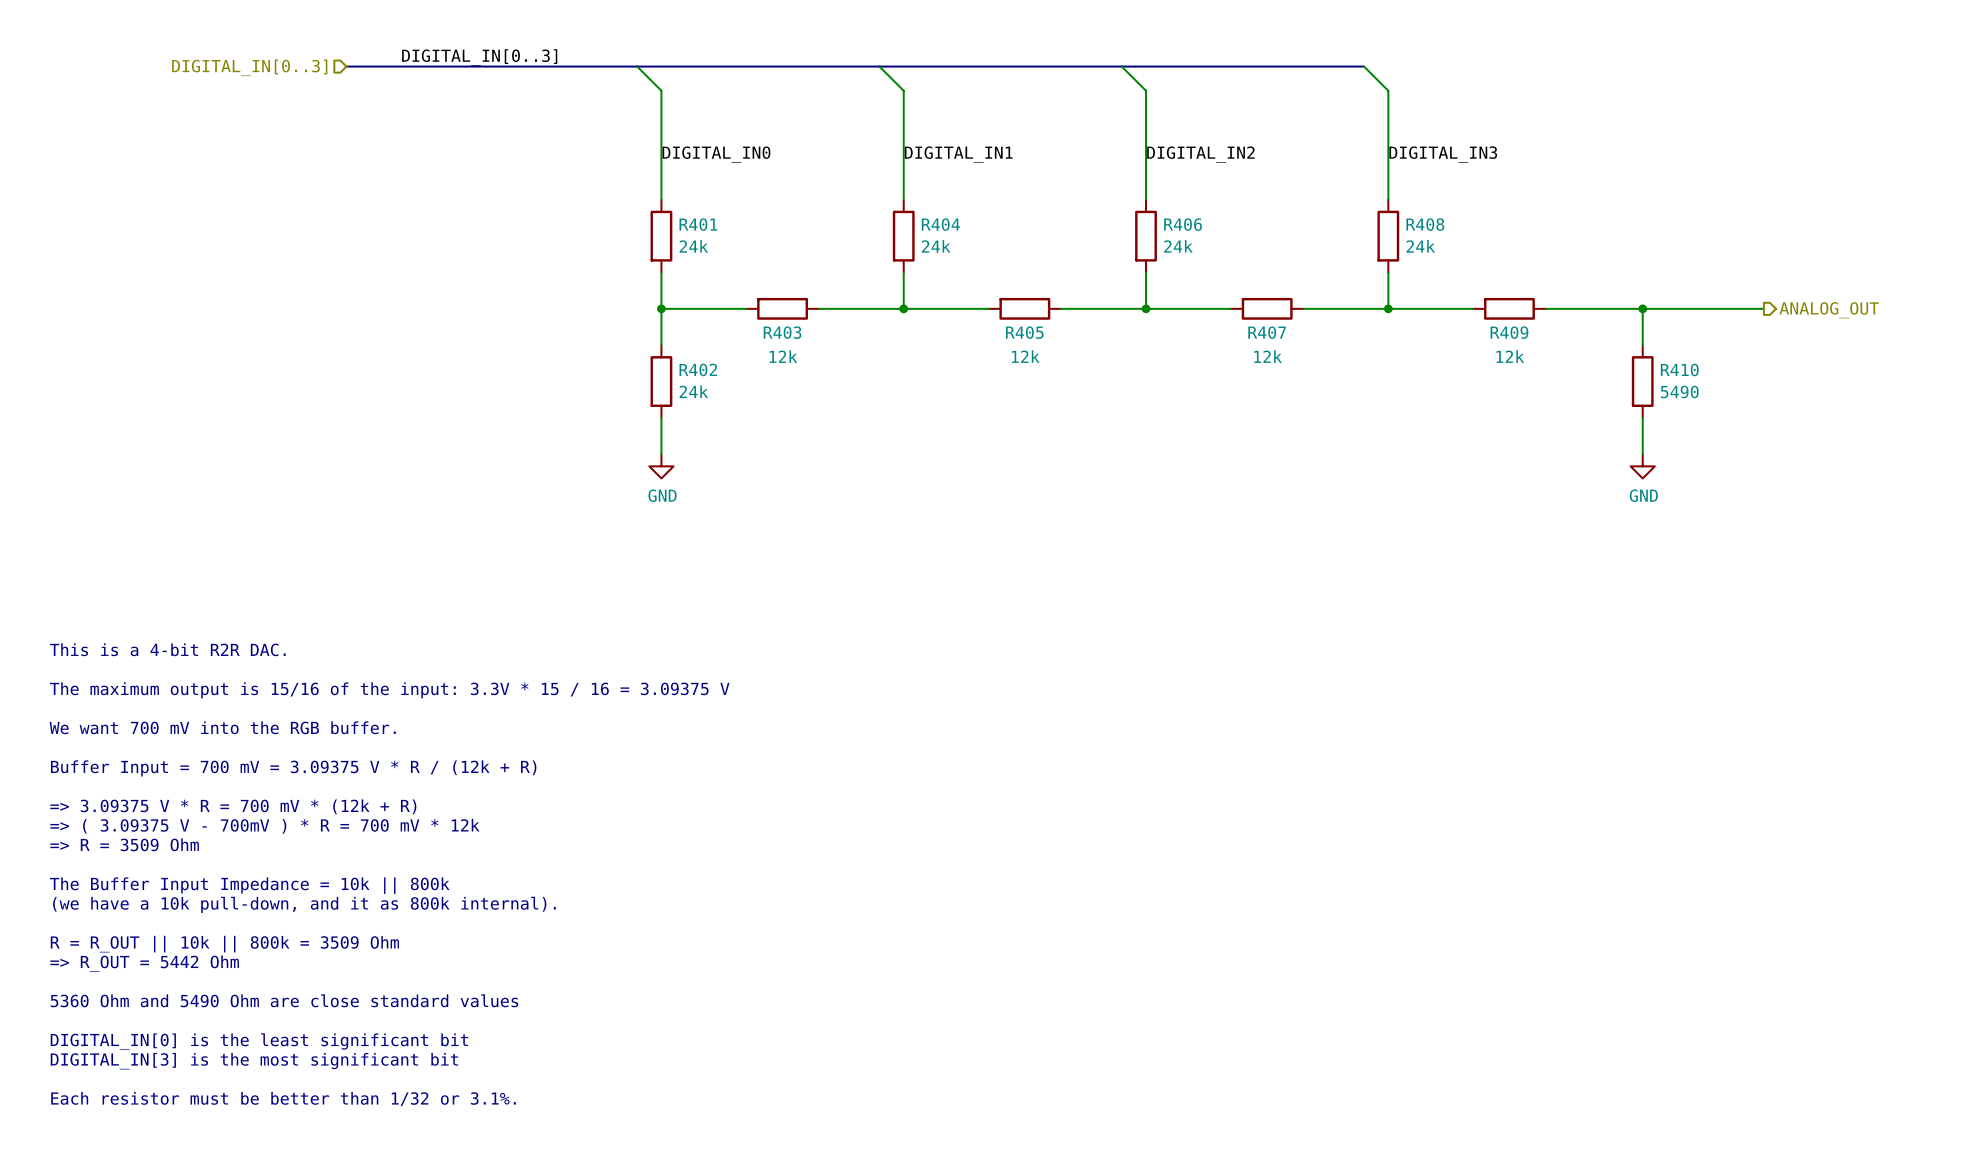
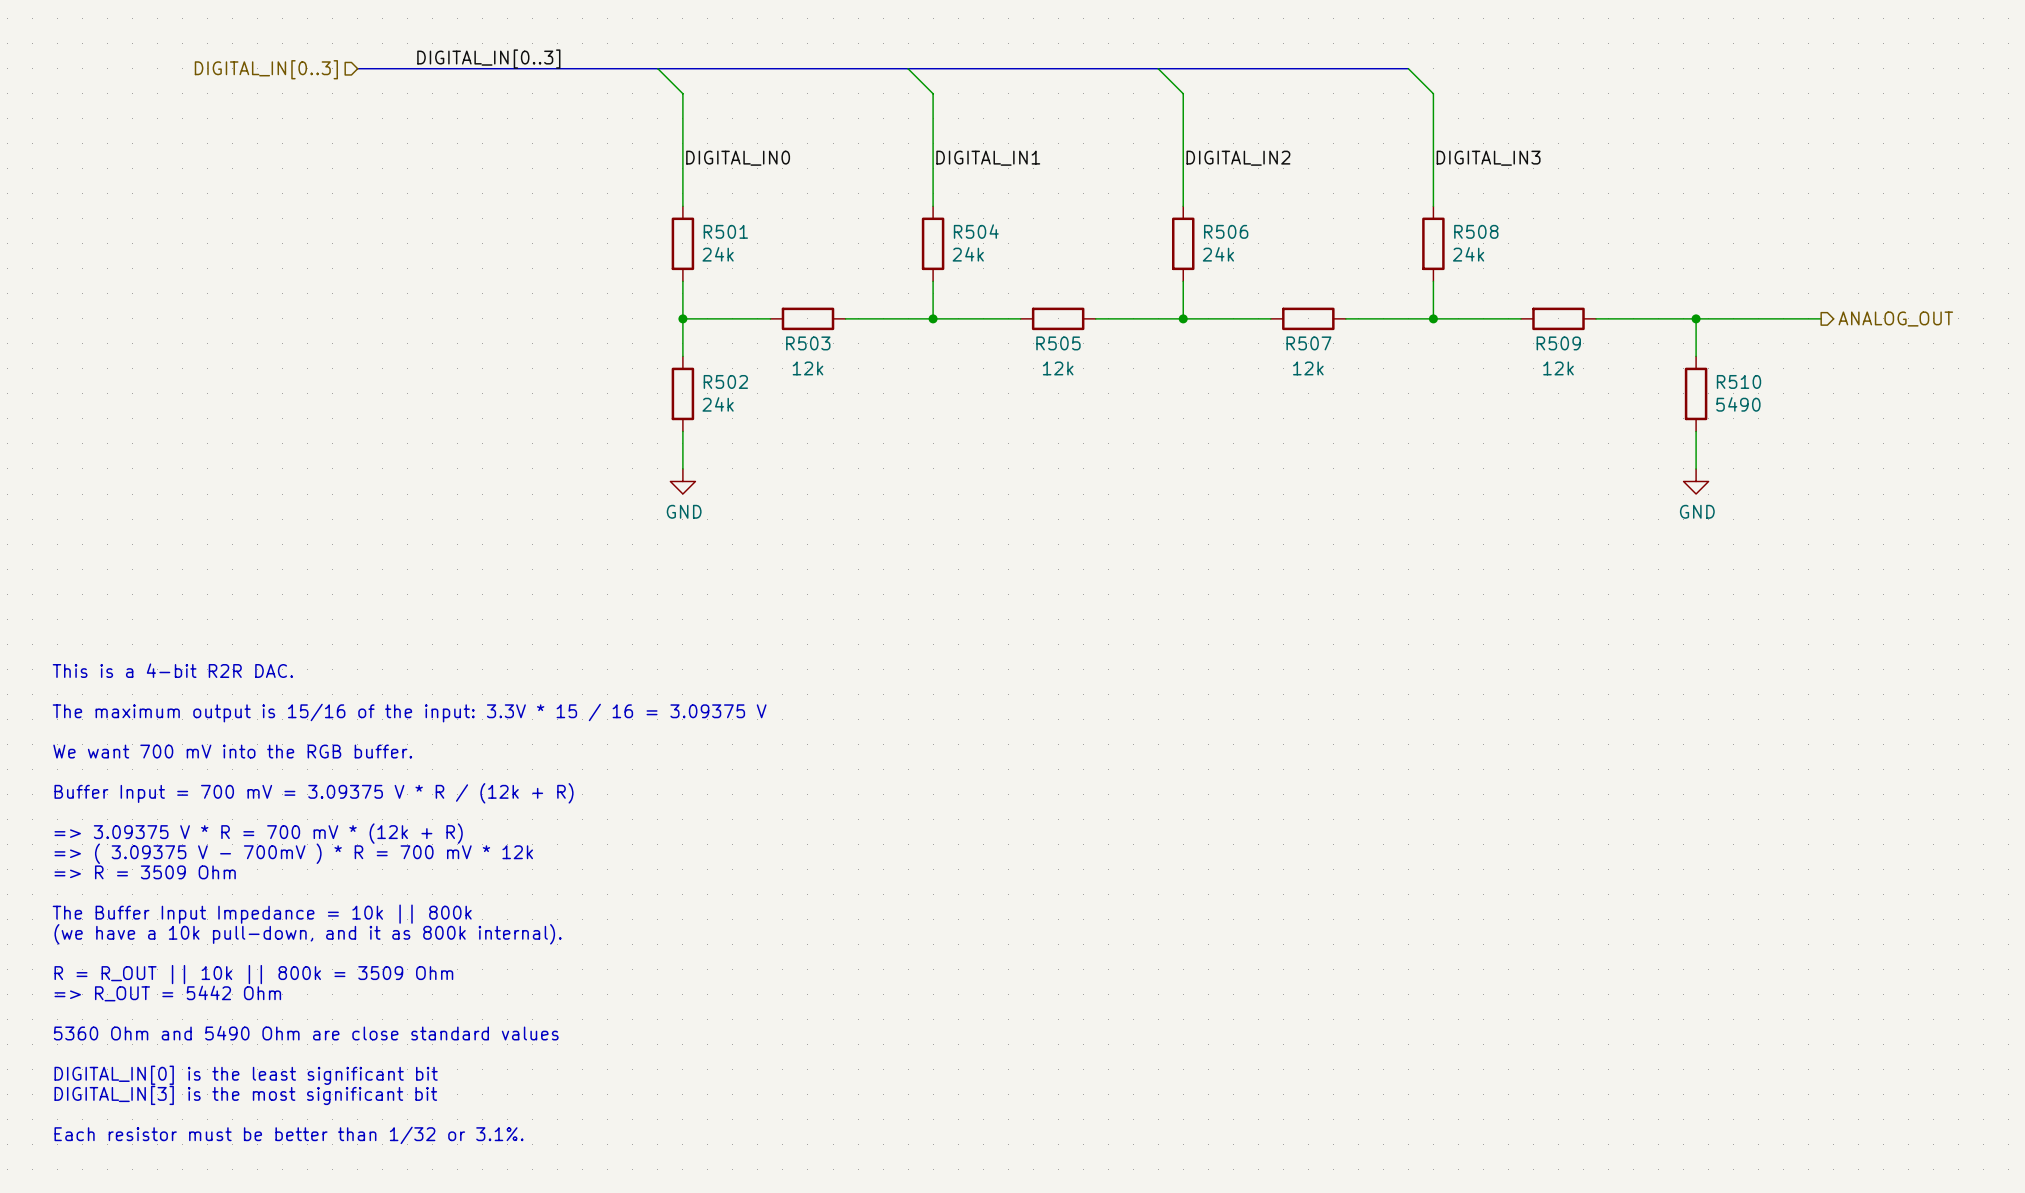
R401 name: R401 (698, 224) -> R501 (725, 231)
R404 name: R404 (940, 224) -> R504 (976, 231)
R406 name: R406 (1183, 224) -> R506 (1226, 231)
R408 name: R408 (1425, 224) -> R508 (1476, 231)
R403 name: R403 (782, 332) -> R503 (808, 343)
R405 name: R405 (1024, 332) -> R505 (1058, 343)
R407 name: R407 (1267, 332) -> R507 (1308, 343)
R409 name: R409 (1509, 332) -> R509 (1558, 343)
R402 name: R402 (698, 369) -> R502 (725, 381)
R410 name: R410 (1679, 369) -> R510 (1739, 381)

